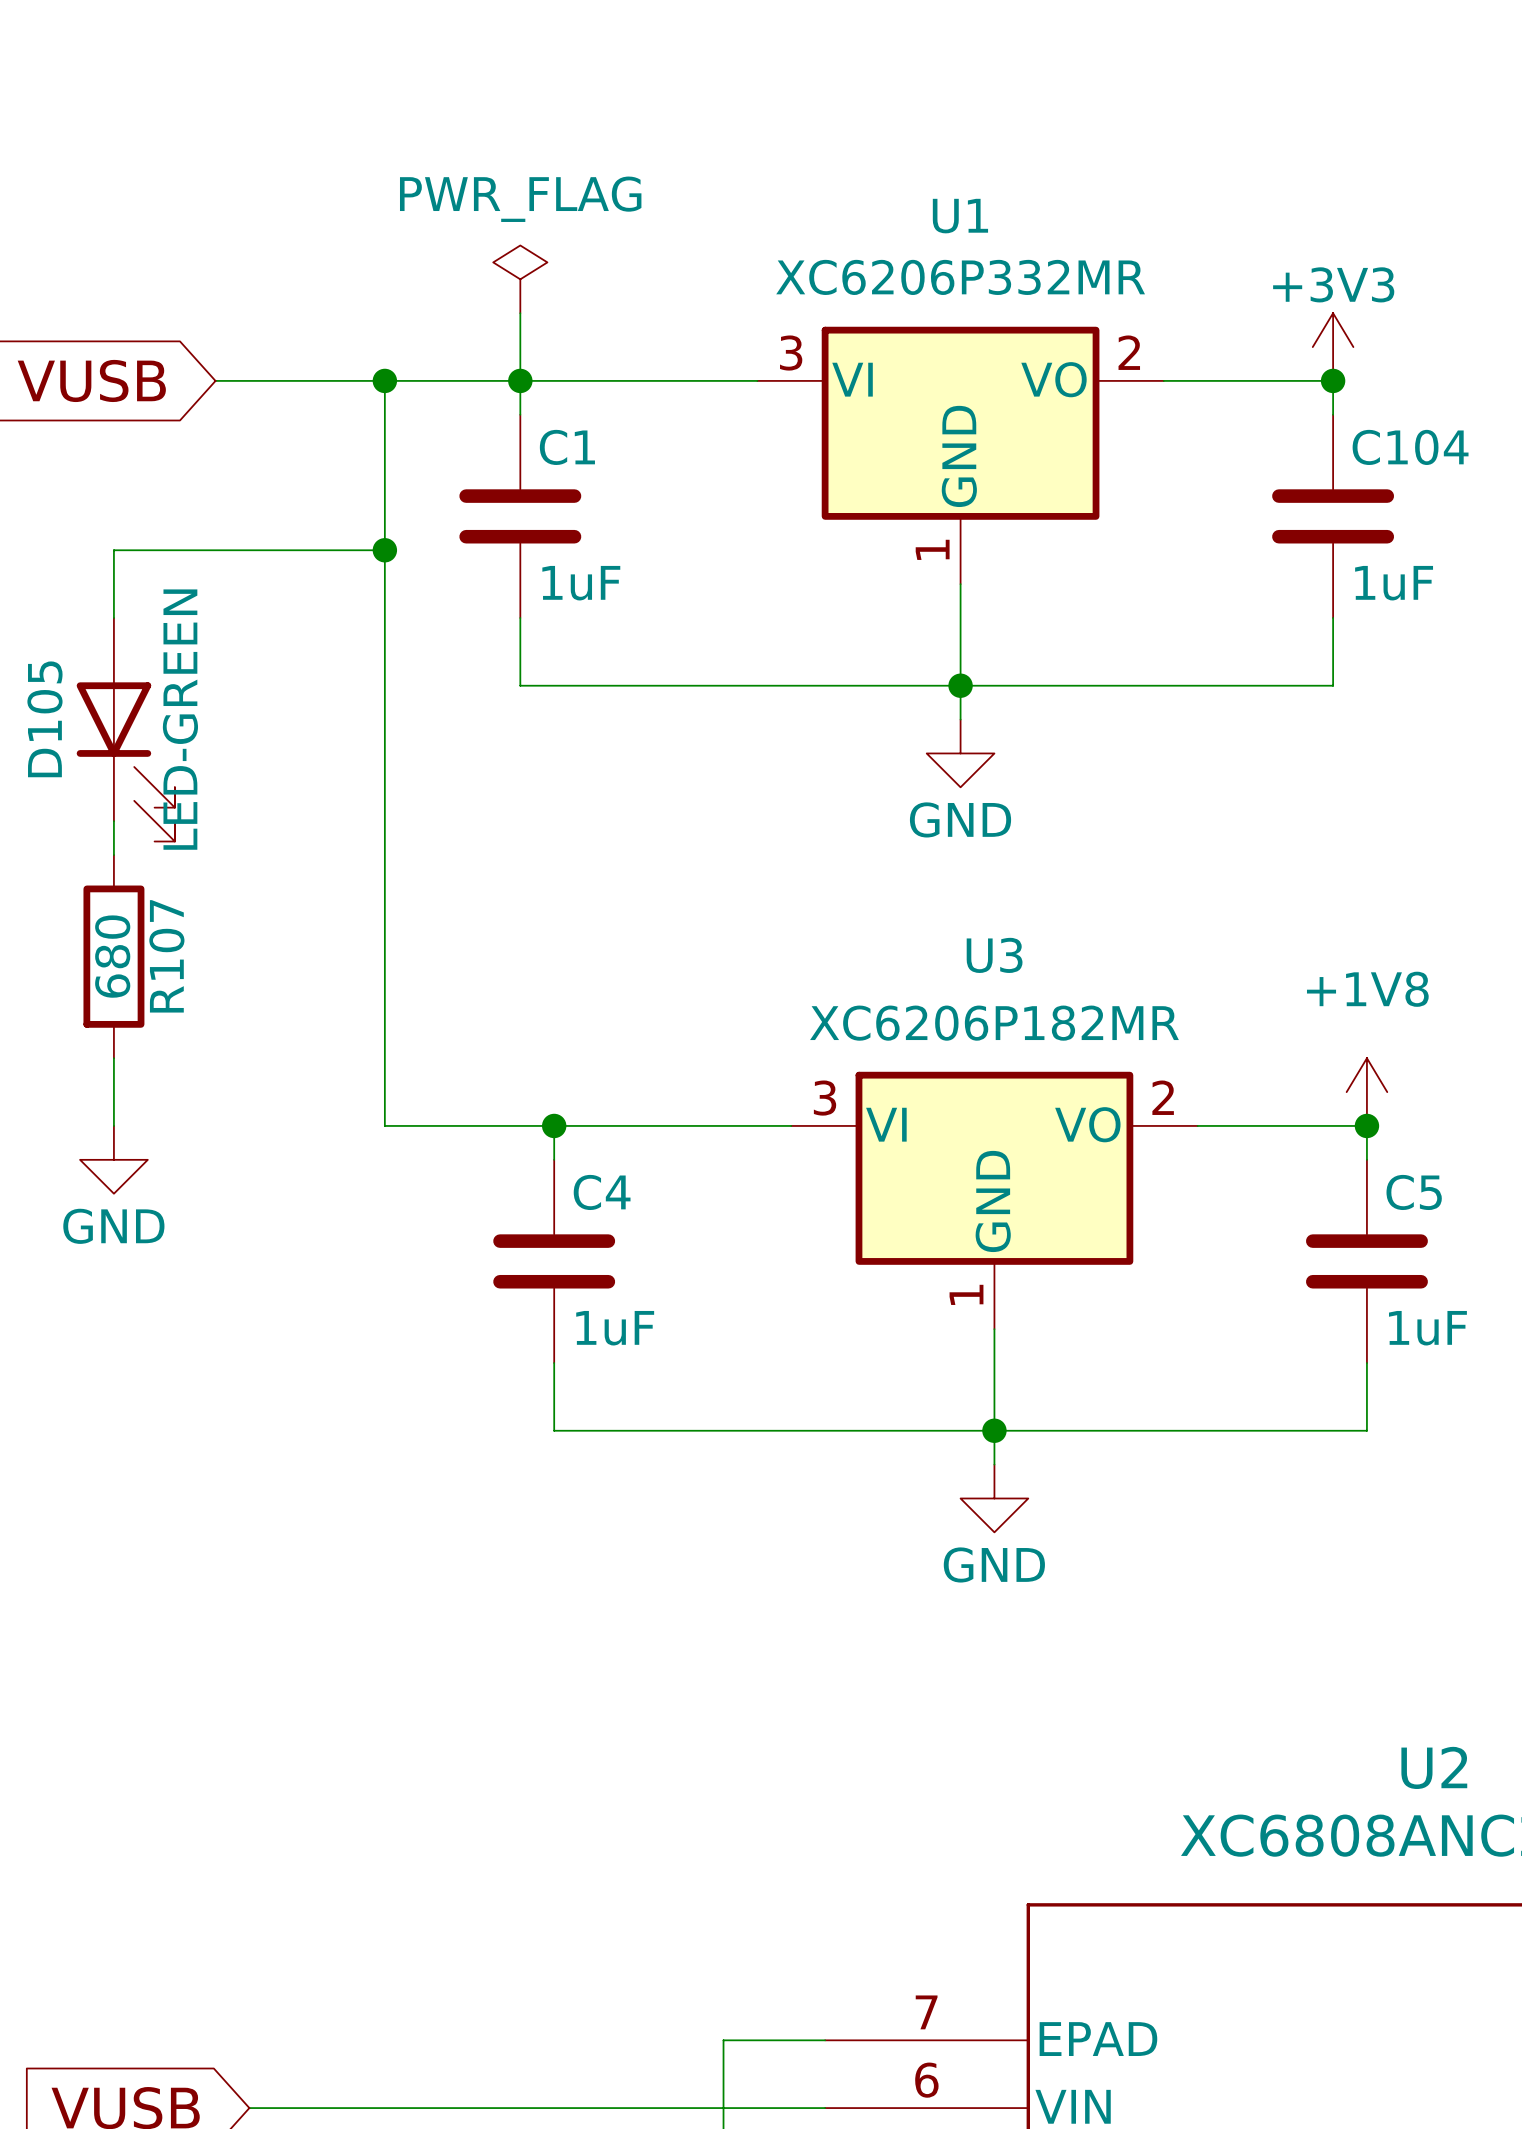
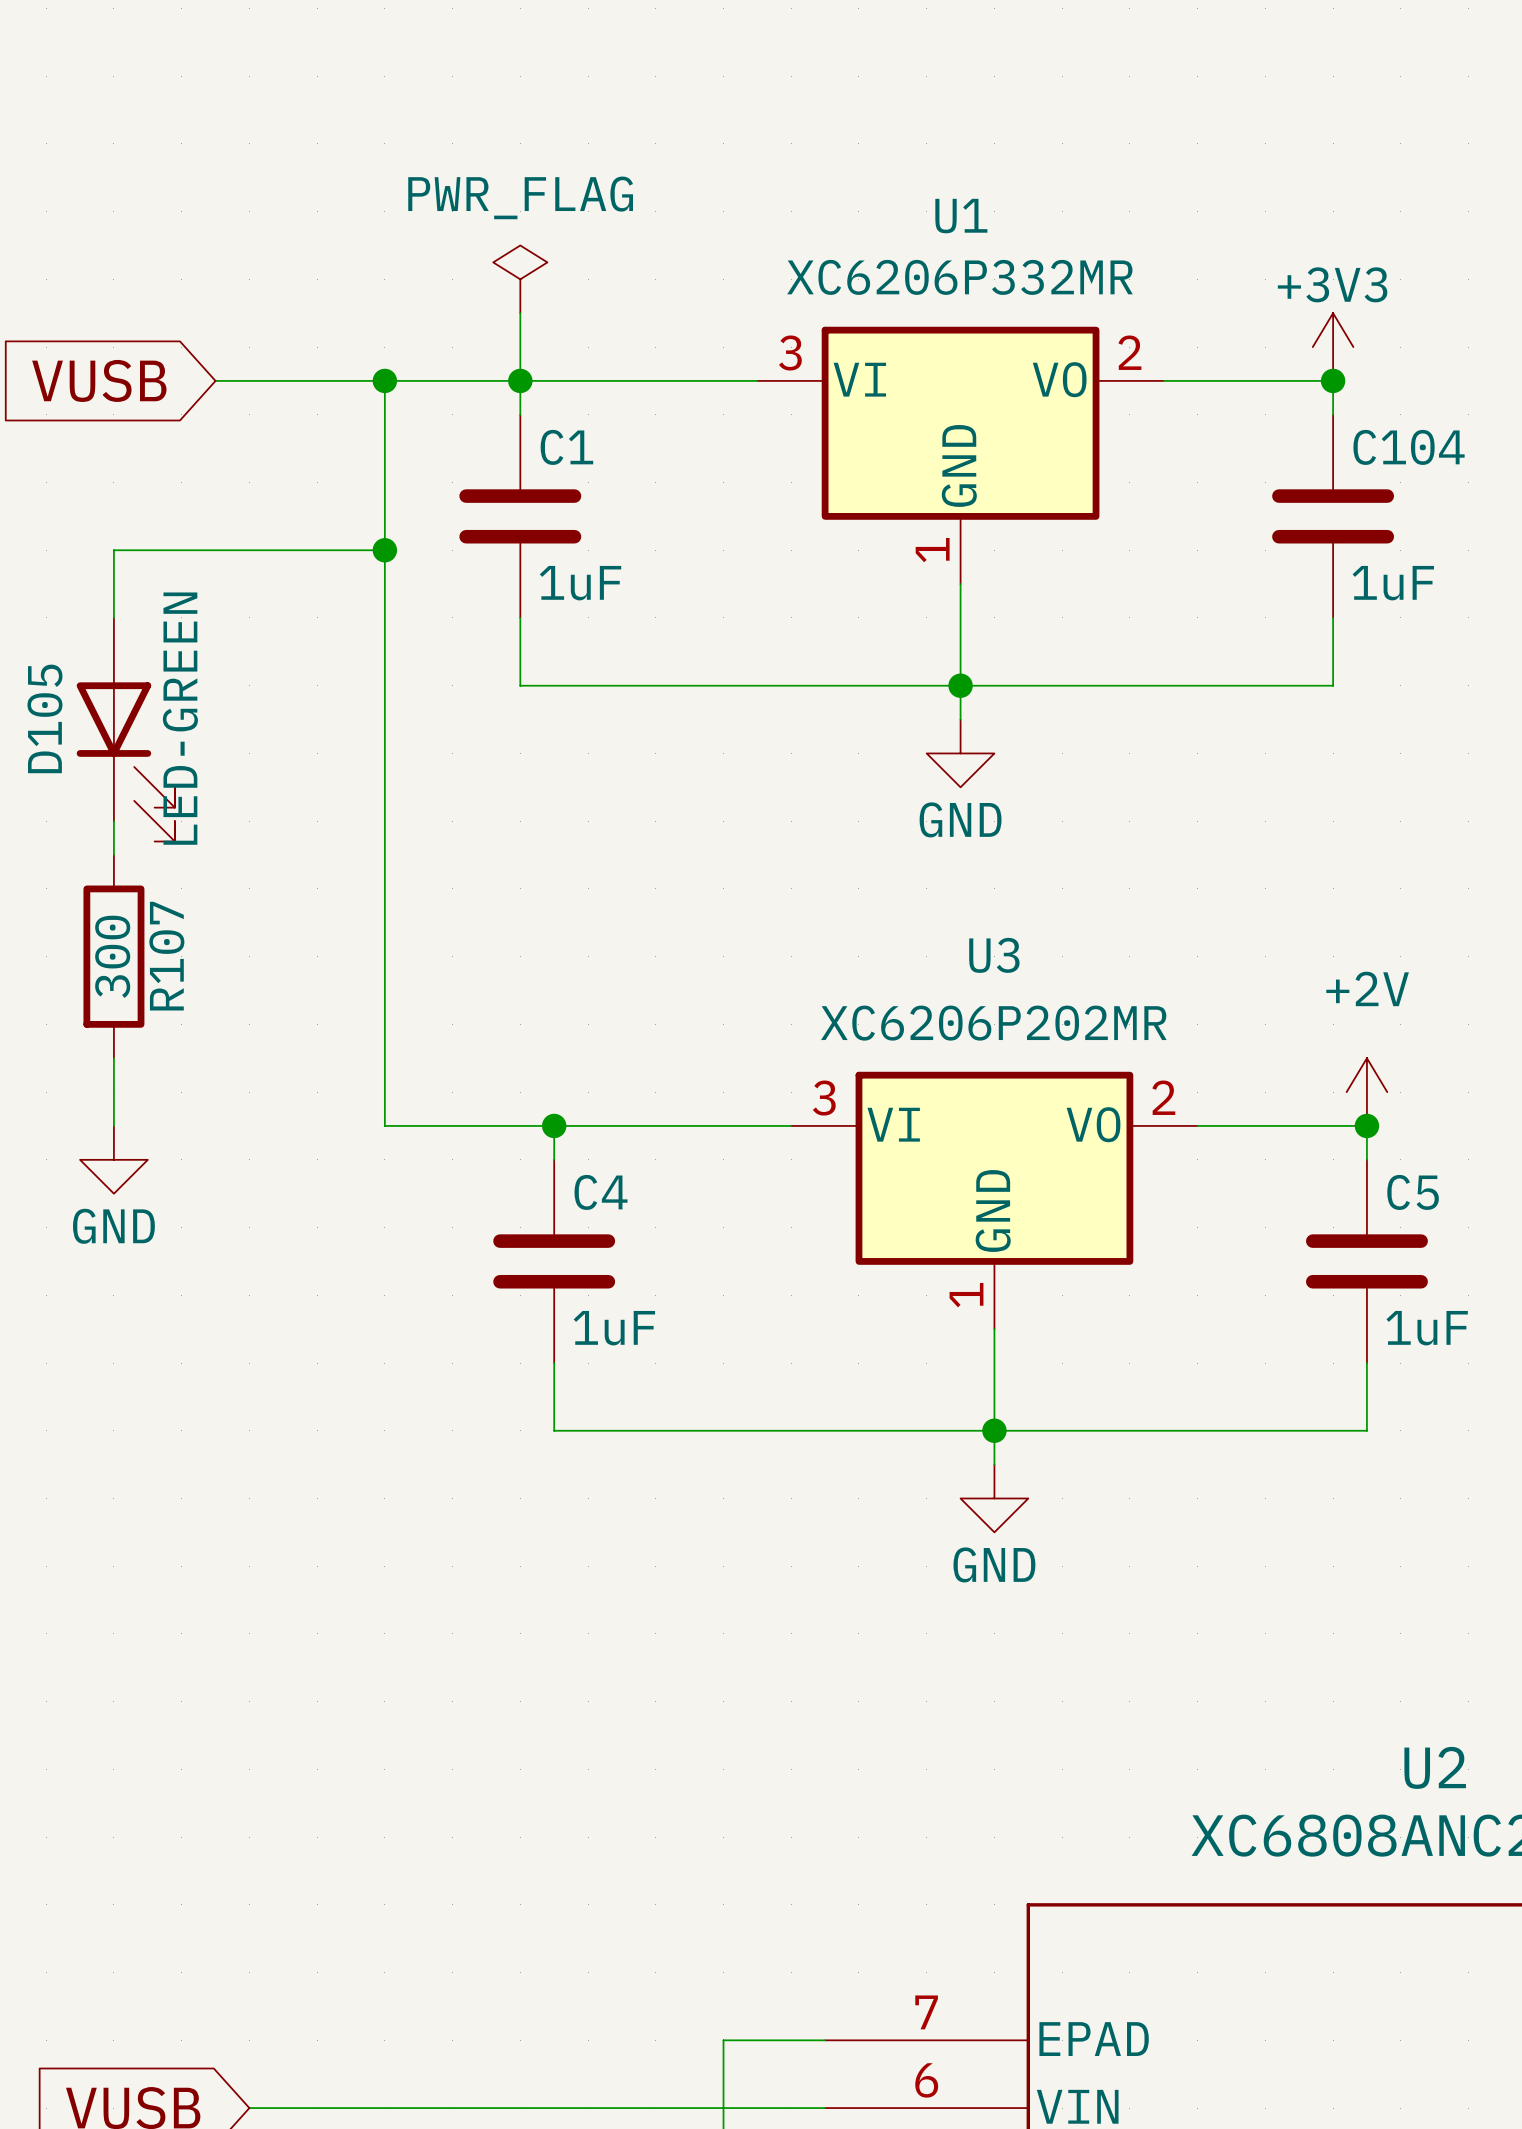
R107 value: 680 (112, 956) -> 300 (112, 956)
U3 value: XC6206P182MR (994, 1023) -> XC6206P202MR (993, 1023)
power symbol: +1V8 (1366, 1092) -> +2V (1366, 1092)

